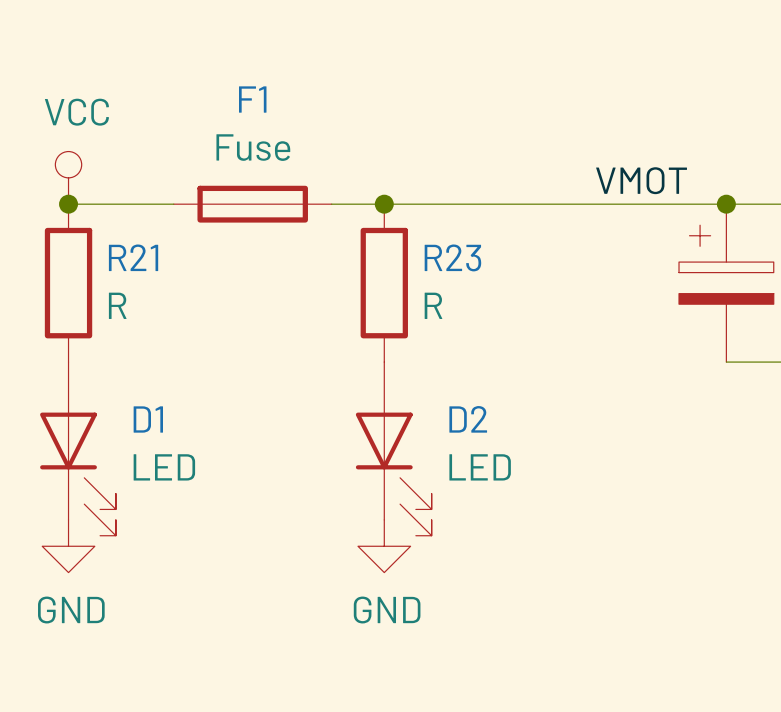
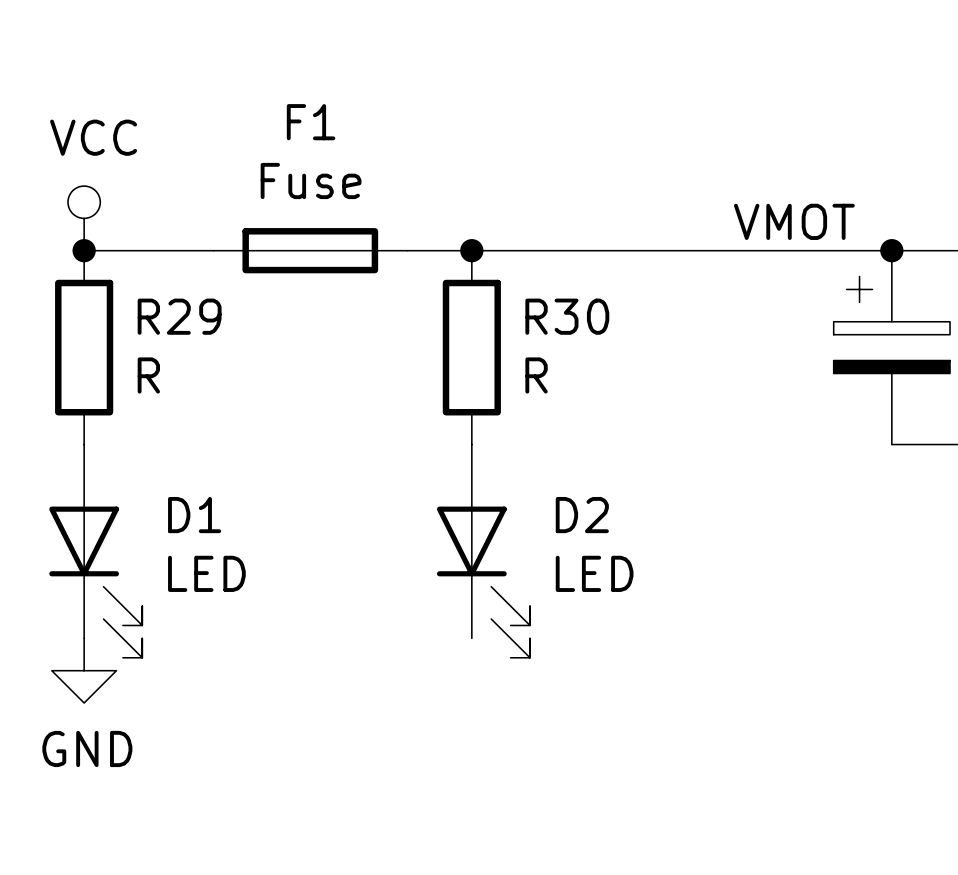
R21 name: R21 (133, 257) -> R29 (179, 316)
R23 name: R23 (452, 257) -> R30 (567, 316)
power symbol: GND (384, 546) -> none

